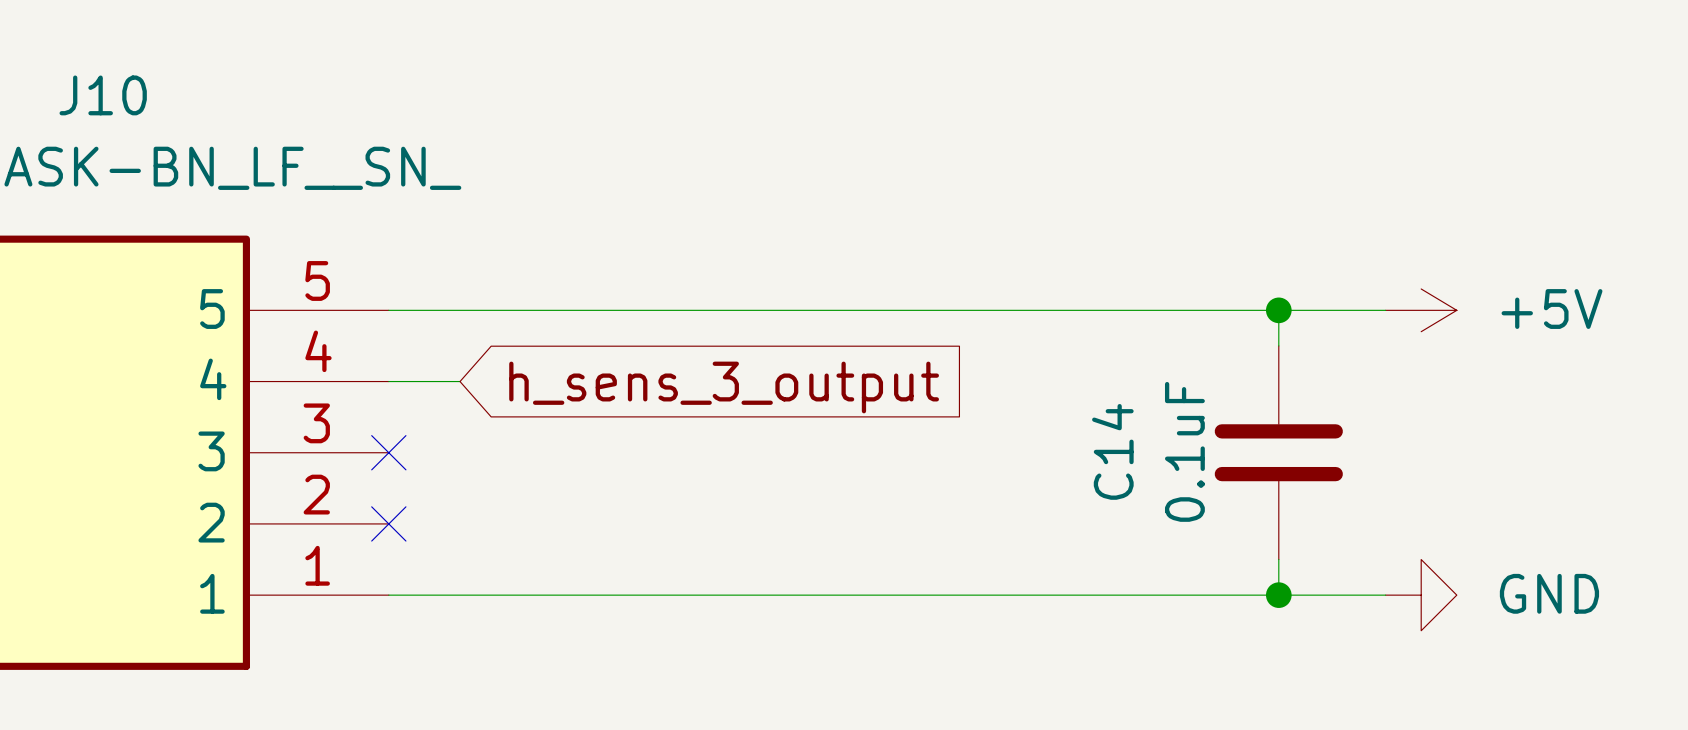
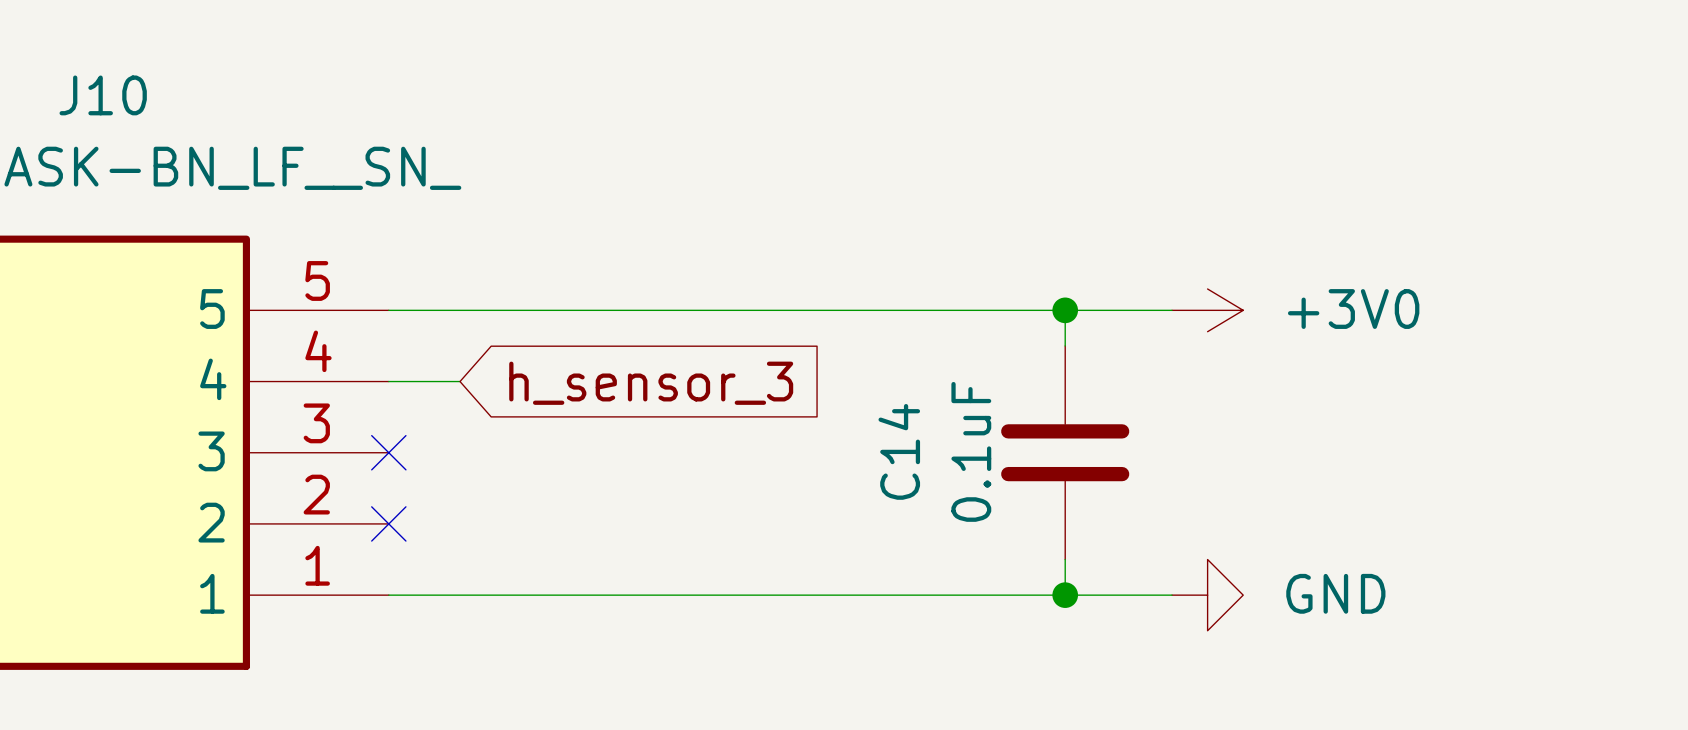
junction: none -> (1065, 310)
wire: (1172, 310) (1385, 310) -> none
power symbol: none -> +3V0 (1207, 310)
wire: (1278, 310) (1278, 345) -> (1065, 310) (1065, 345)
junction: (1278, 310) -> none
power symbol: +5V (1421, 310) -> none
global label: h_sens_3_output (724, 387) -> h_sensor_3 (651, 383)
C14 position: (1278, 452) -> (1065, 452)
wire: (1278, 559) (1278, 595) -> (1065, 559) (1065, 595)
junction: none -> (1065, 595)
wire: (1172, 595) (1385, 595) -> none
junction: (1278, 595) -> none
power symbol position: GND (1421, 595) -> GND (1207, 595)

